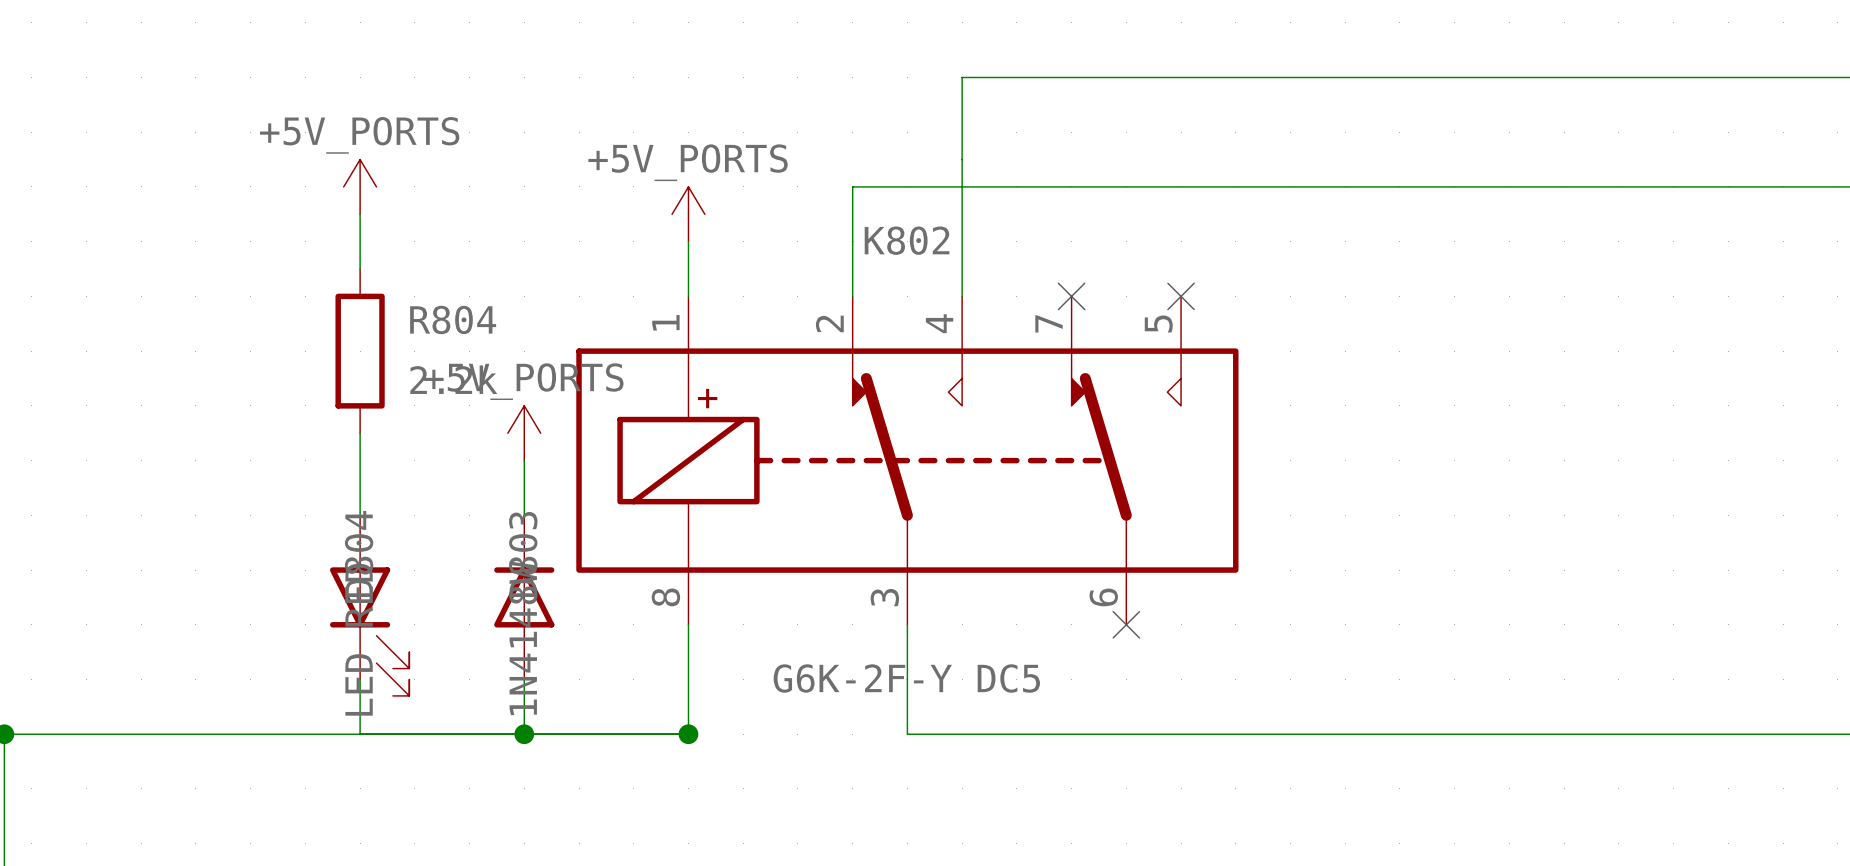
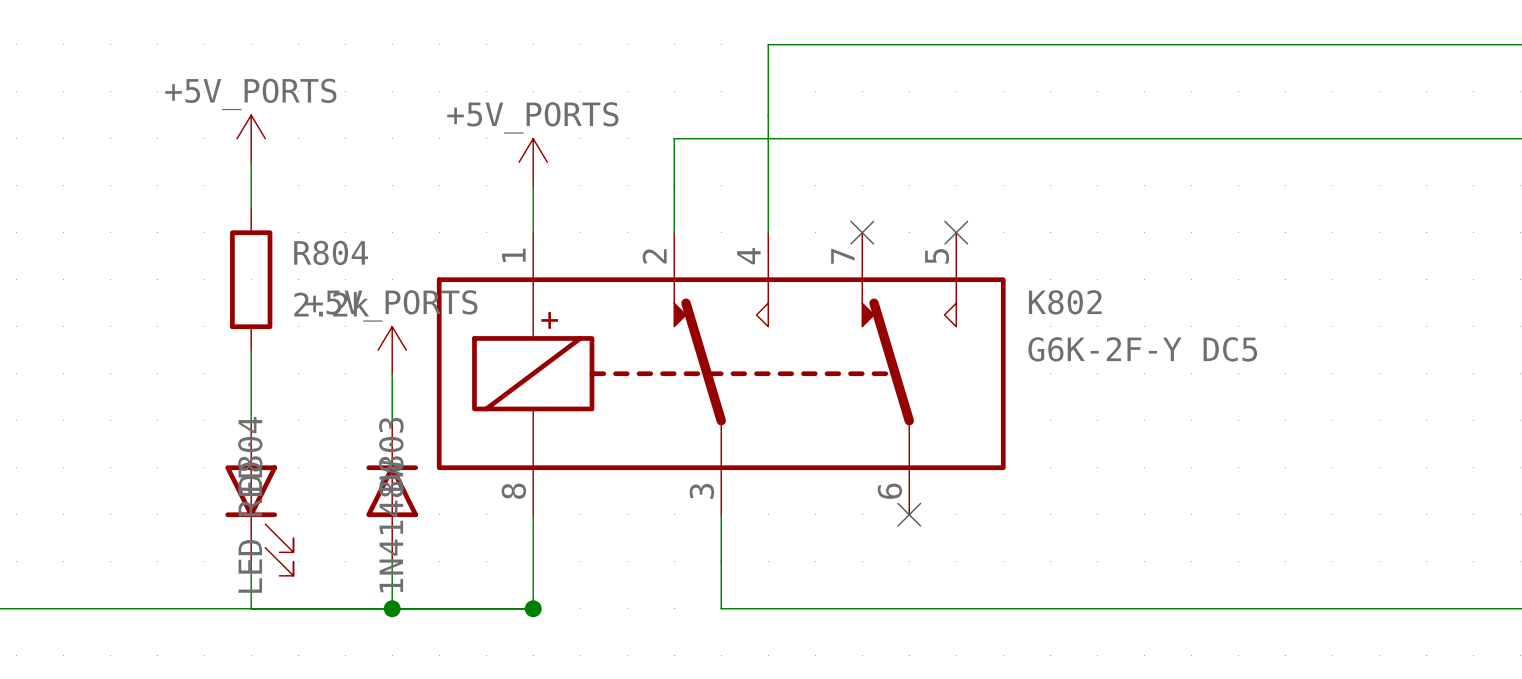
K802 name position: K802 (907, 240) -> K802 (1065, 302)
K802 value position: G6K-2F-Y DC5 (906, 678) -> G6K-2F-Y DC5 (1142, 349)

